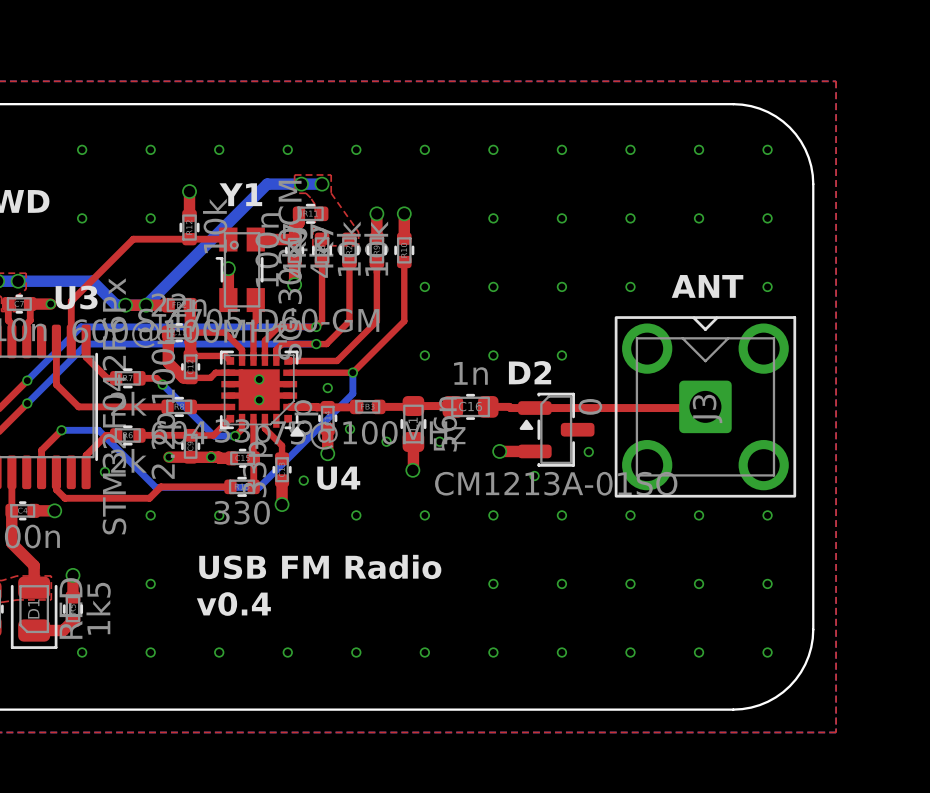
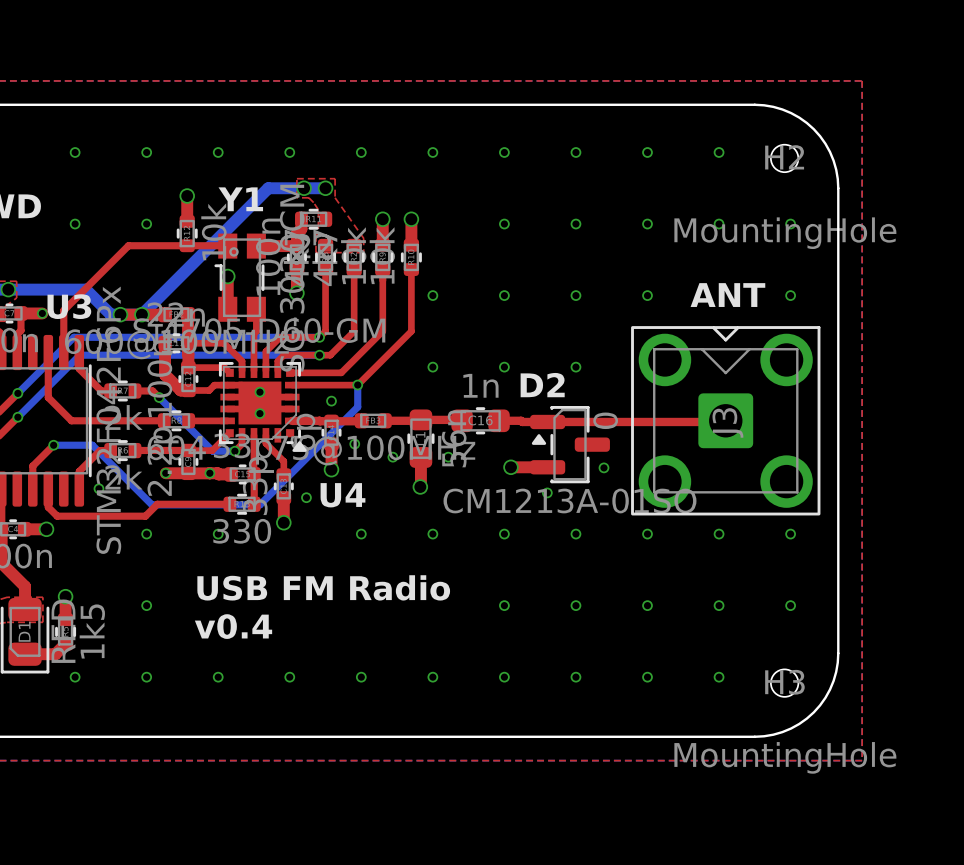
via: (767, 149) -> none
H2: none -> MountingHole (784, 158)
via: (767, 652) -> none
H3: none -> MountingHole (784, 683)

